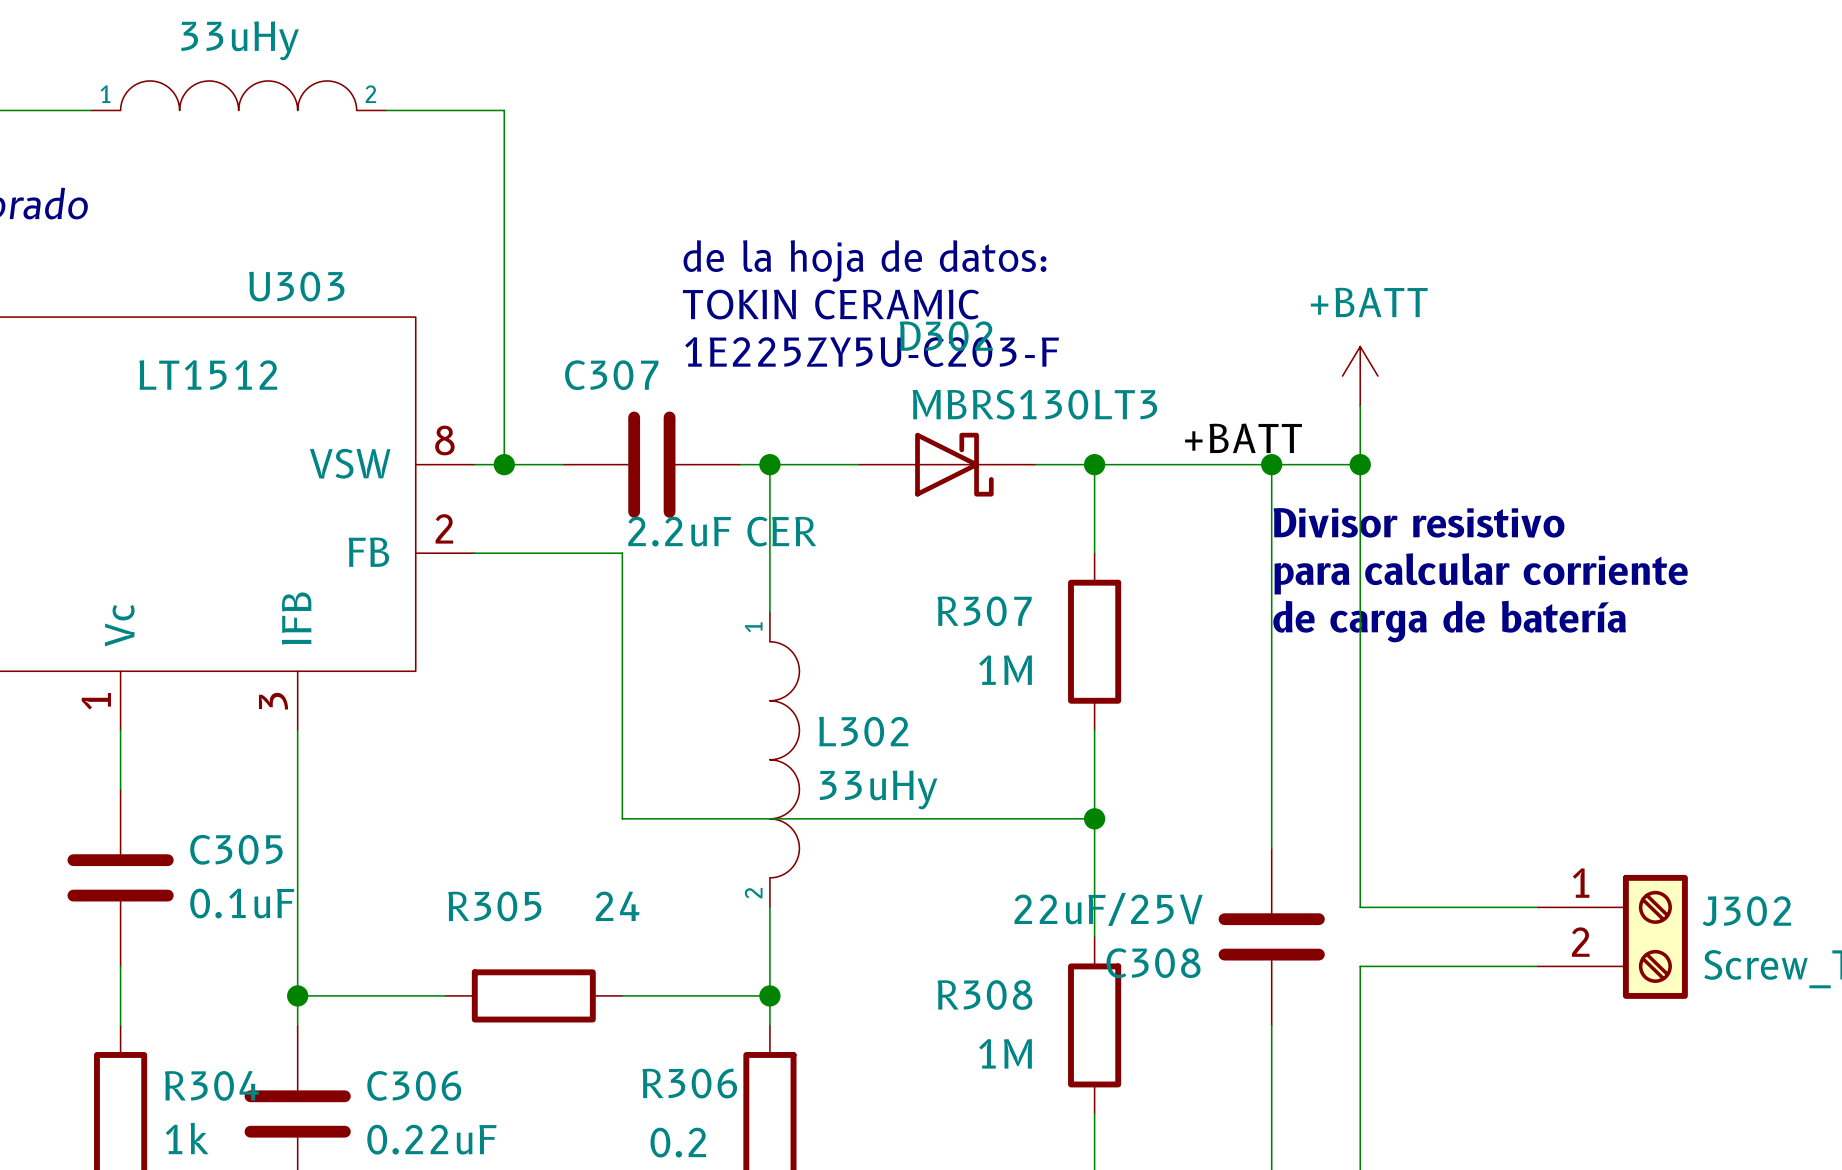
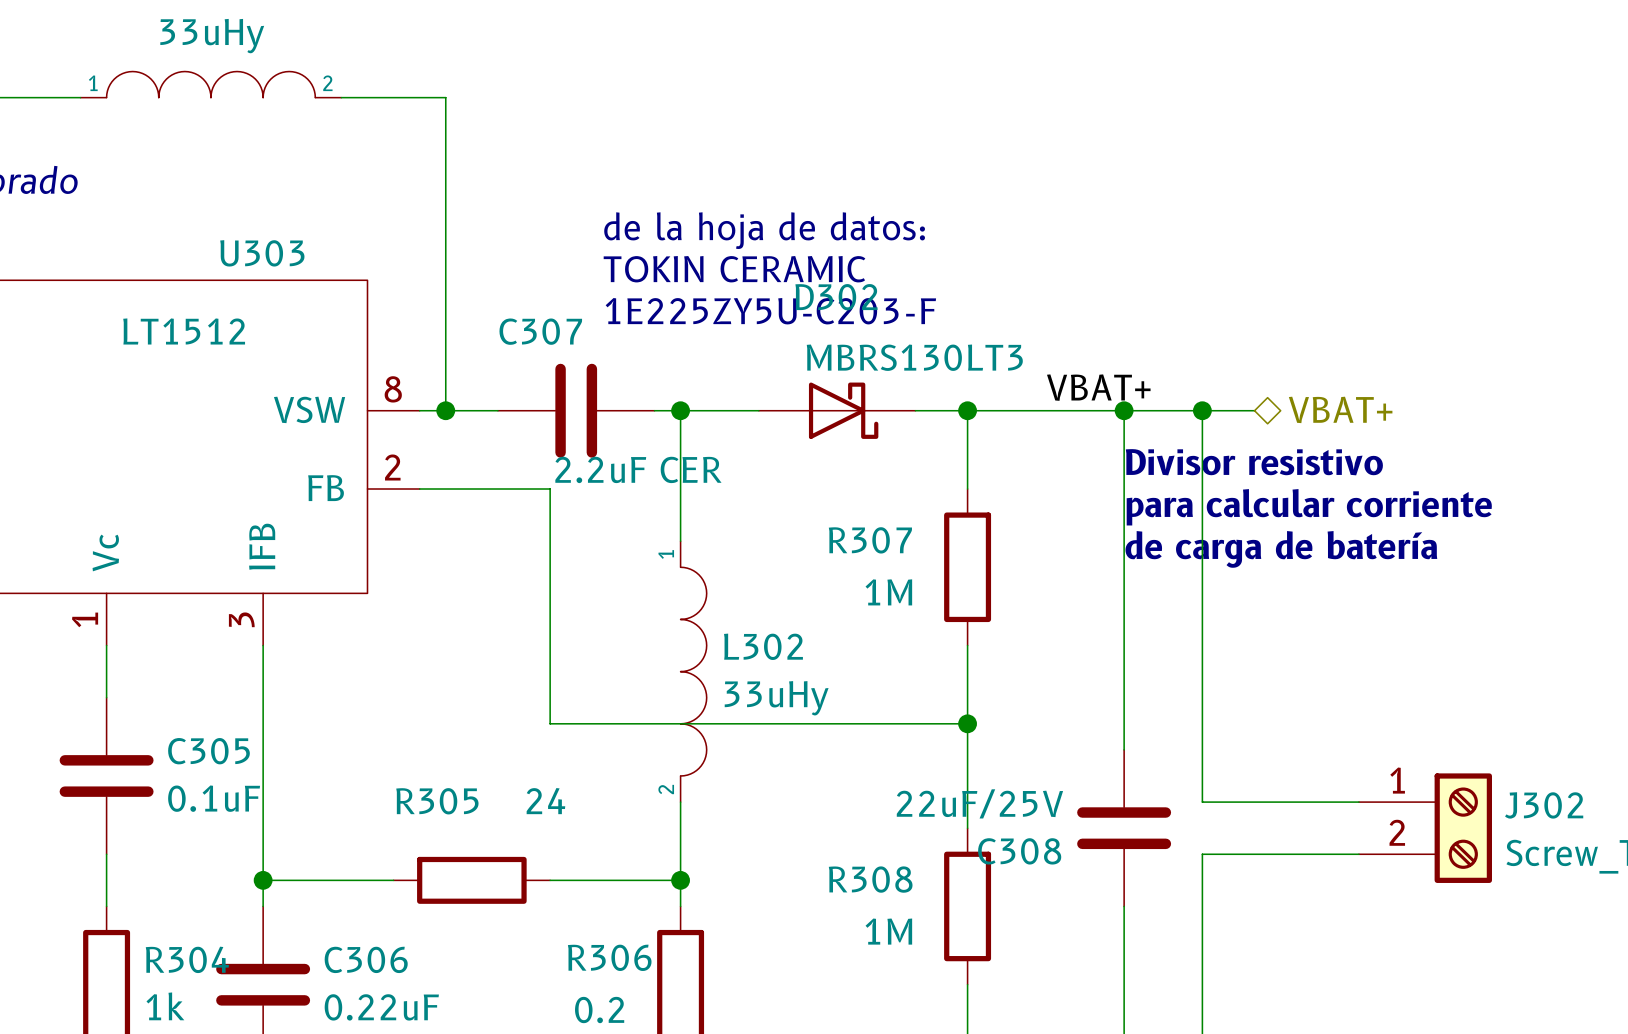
power symbol: +BATT (1360, 376) -> none
wire: (1360, 405) (1360, 464) -> (1254, 410) (1202, 410)
label: +BATT (1243, 438) -> VBAT+ (1098, 387)
hierarchical label: none -> VBAT+ (1340, 409)

